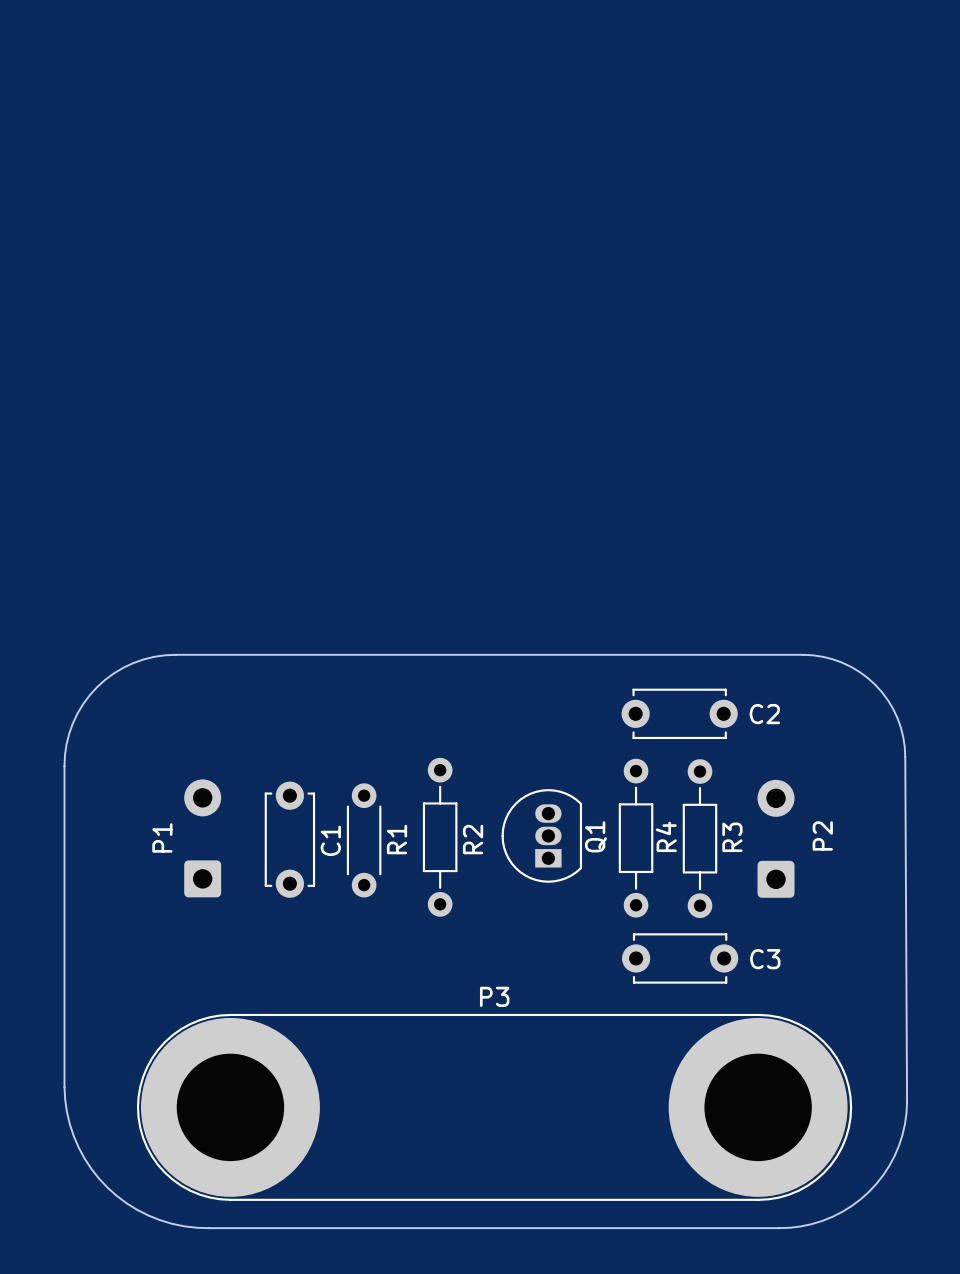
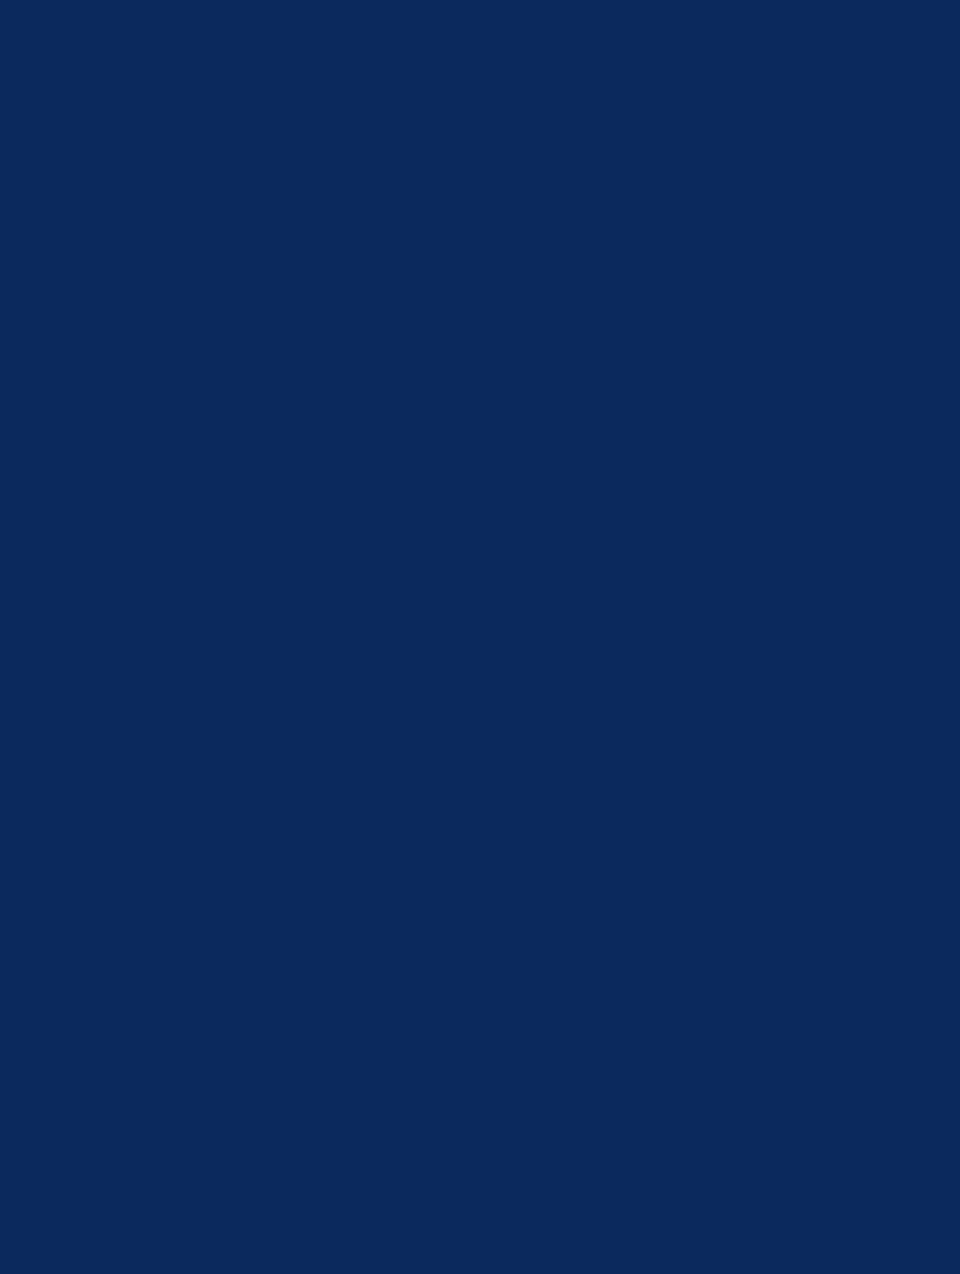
board edge: (175, 654) (802, 654) (832, 659) (859, 672) (882, 692) (893, 708) (903, 737) (905, 757) (907, 1102) (904, 1124) (899, 1145) (883, 1174) (860, 1199) (842, 1211) (811, 1224) (789, 1227) (196, 1227) (160, 1220) (126, 1203) (107, 1187) (84, 1158) (73, 1135) (65, 1099) (64, 755) (69, 733) (77, 713) (89, 695) (105, 679) (133, 663) (154, 656) (175, 654) -> none
C2: (679, 713) -> none
Q1: (541, 835) -> none
R2: (440, 837) -> none
P1: (202, 838) -> none
R4: (636, 838) -> none
R3: (699, 838) -> none
P2: (776, 838) -> none
C1: (289, 839) -> none
R1: (364, 840) -> none
C3: (680, 958) -> none
P3: (494, 1107) -> none

